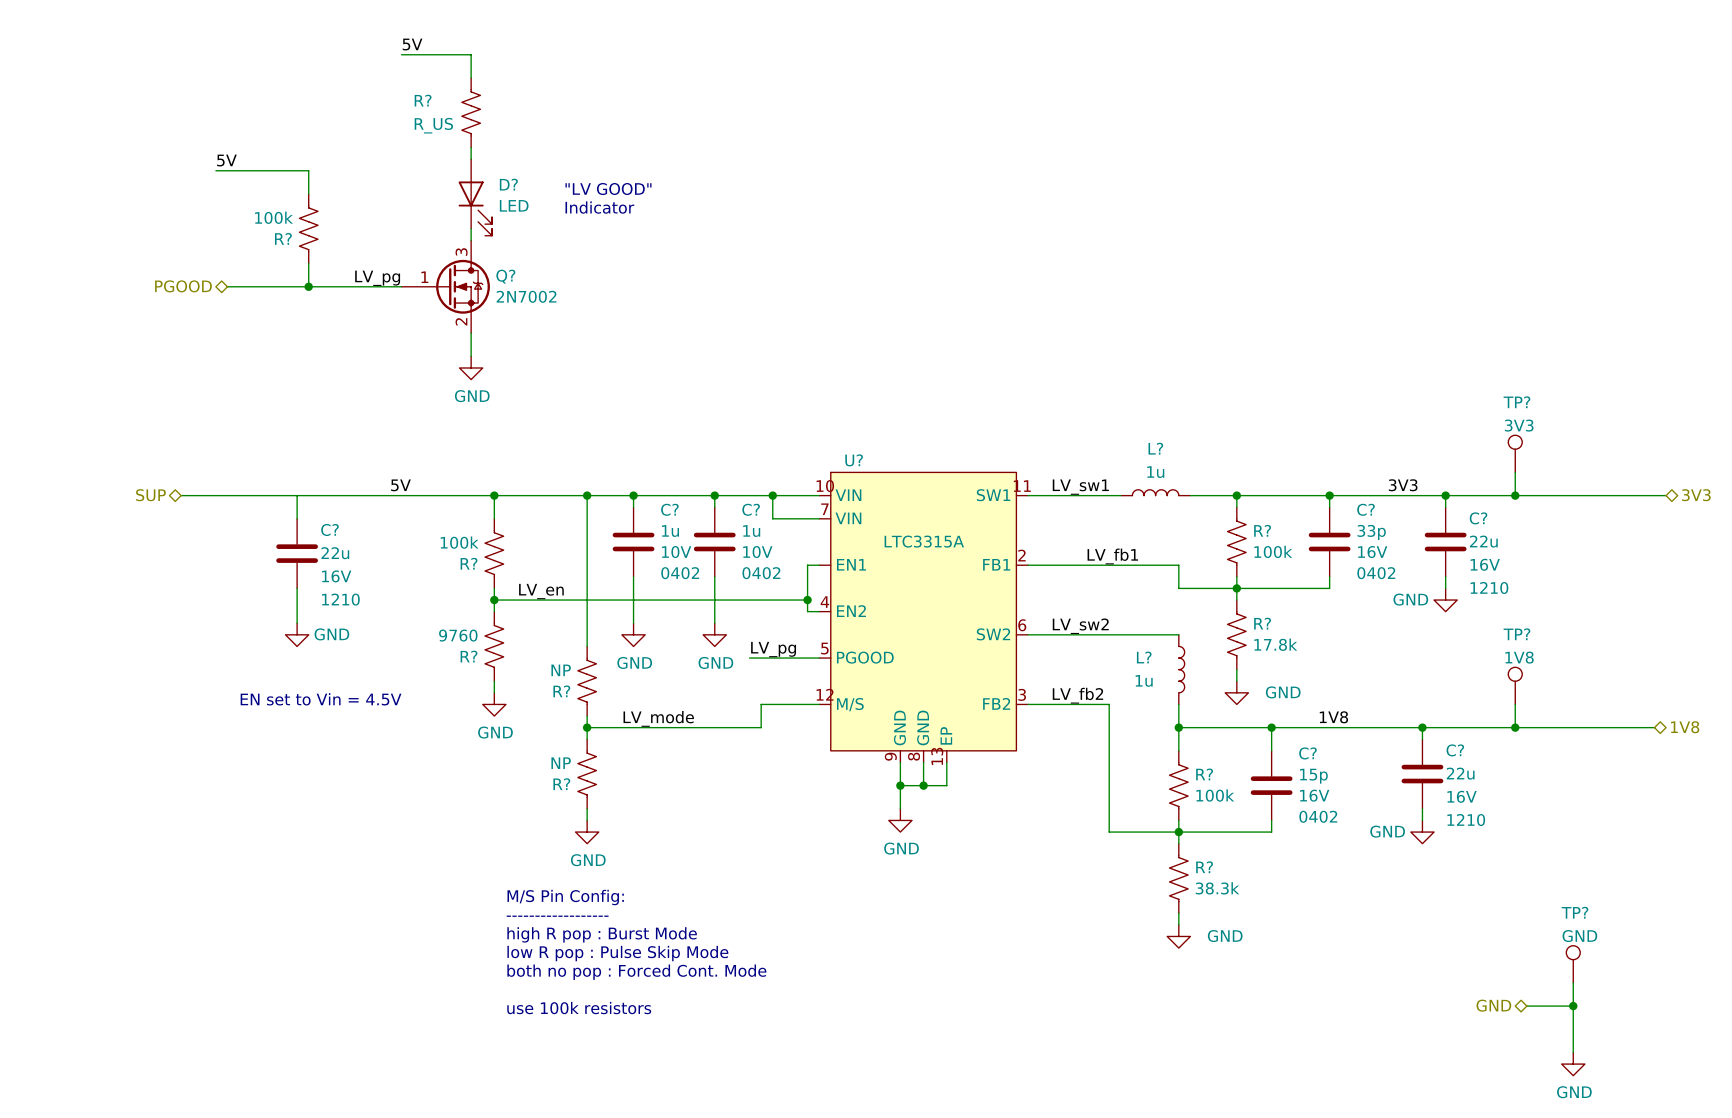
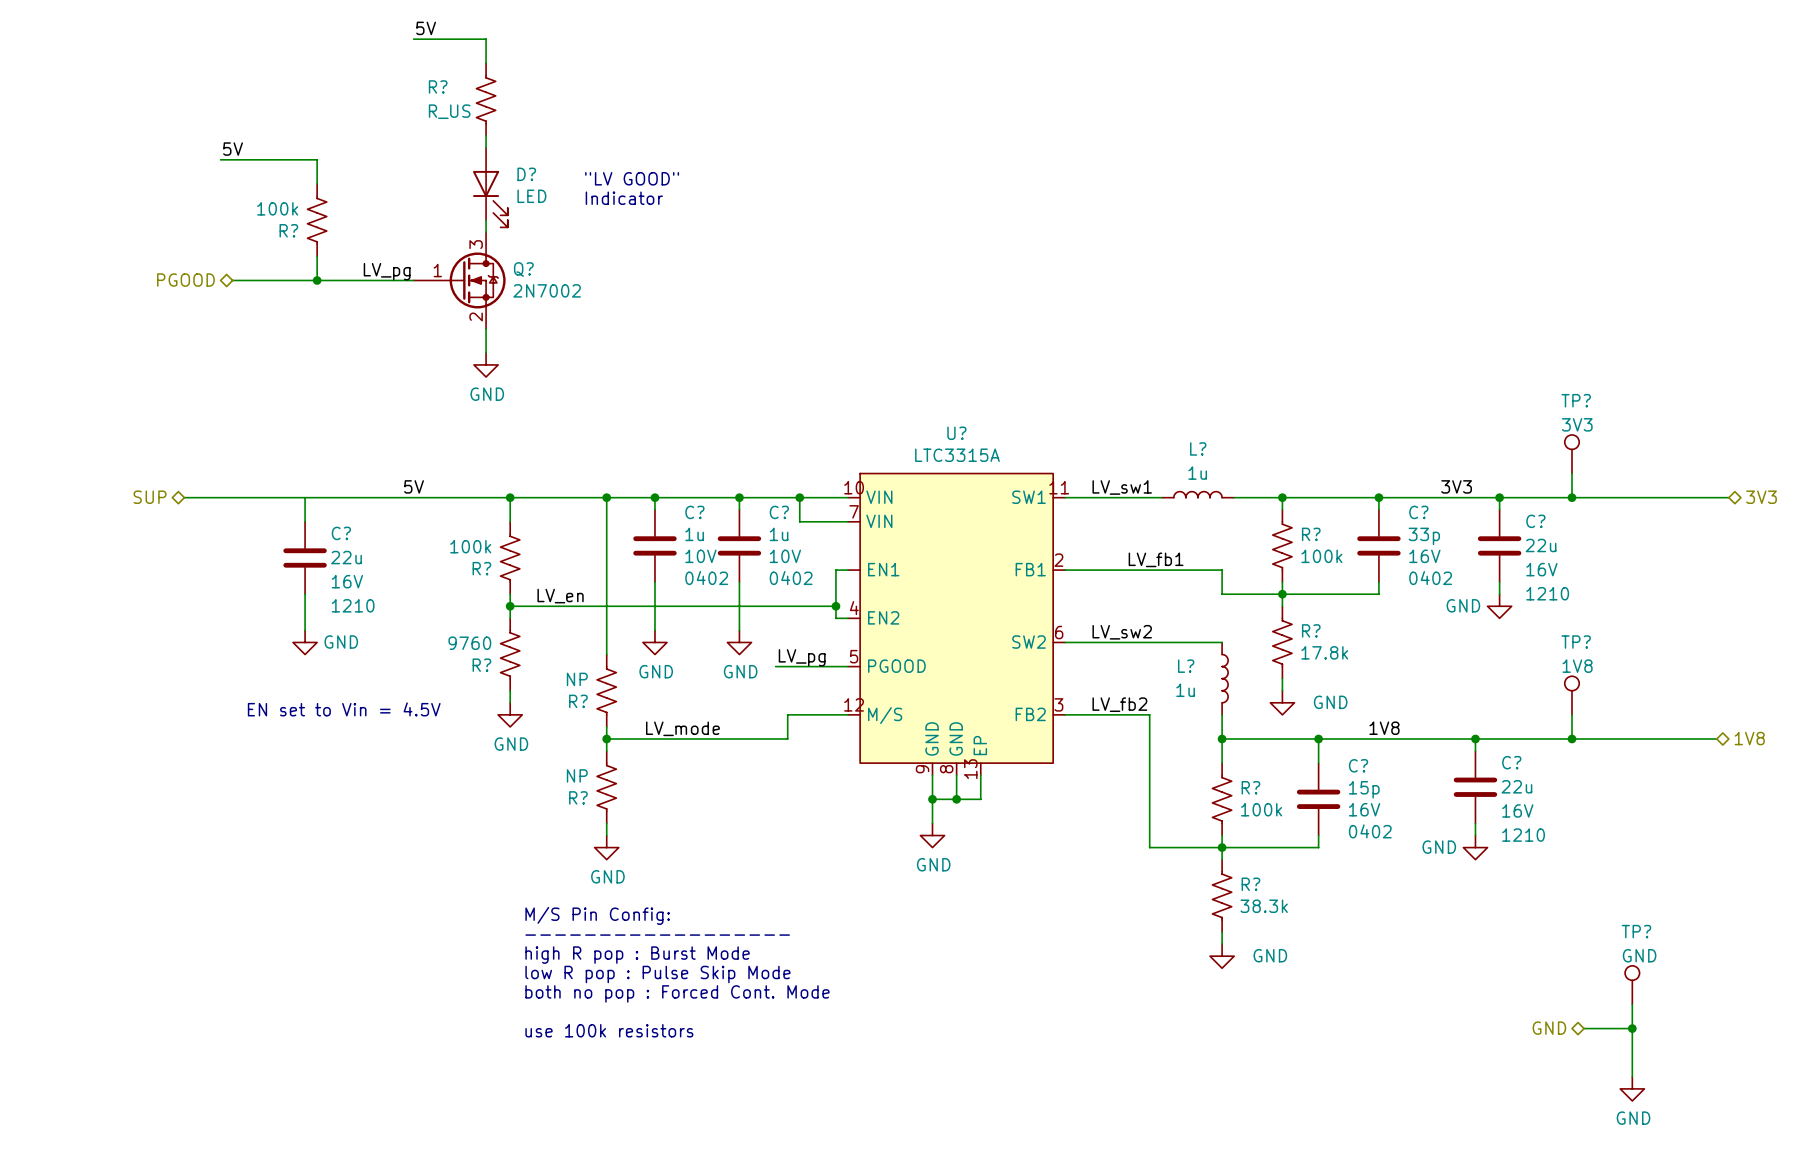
U? name position: U? (854, 460) -> U? (956, 433)
U? value position: LTC3315A (924, 541) -> LTC3315A (957, 455)

